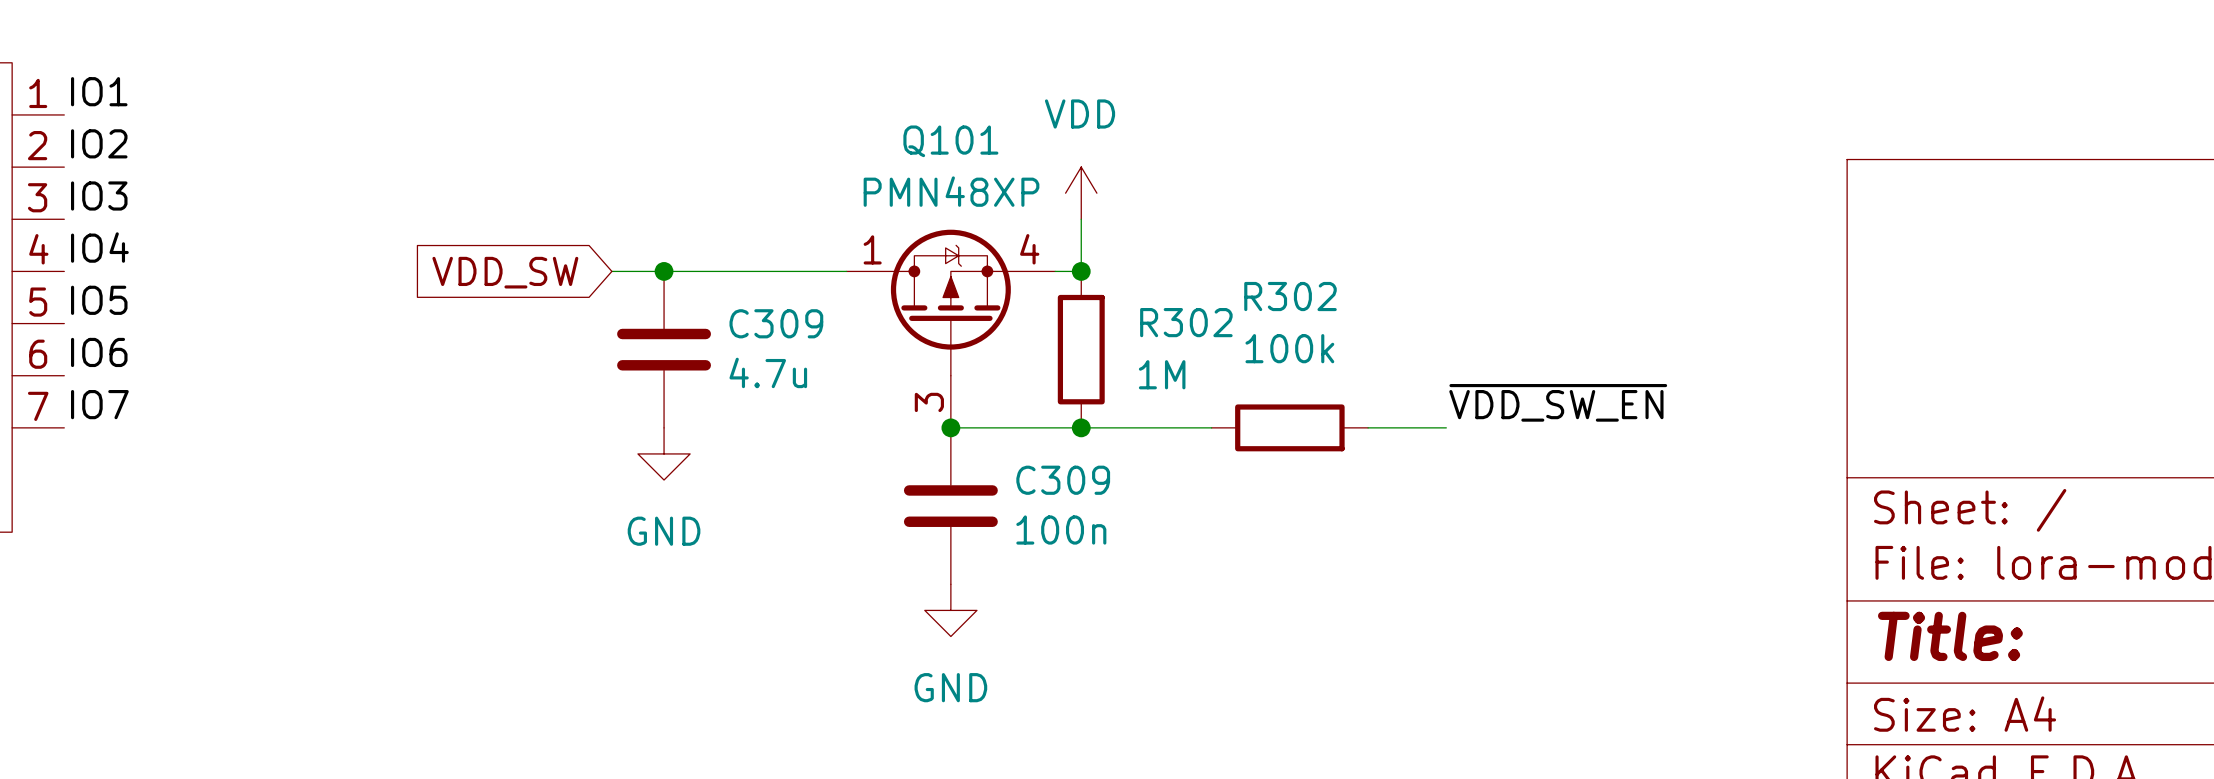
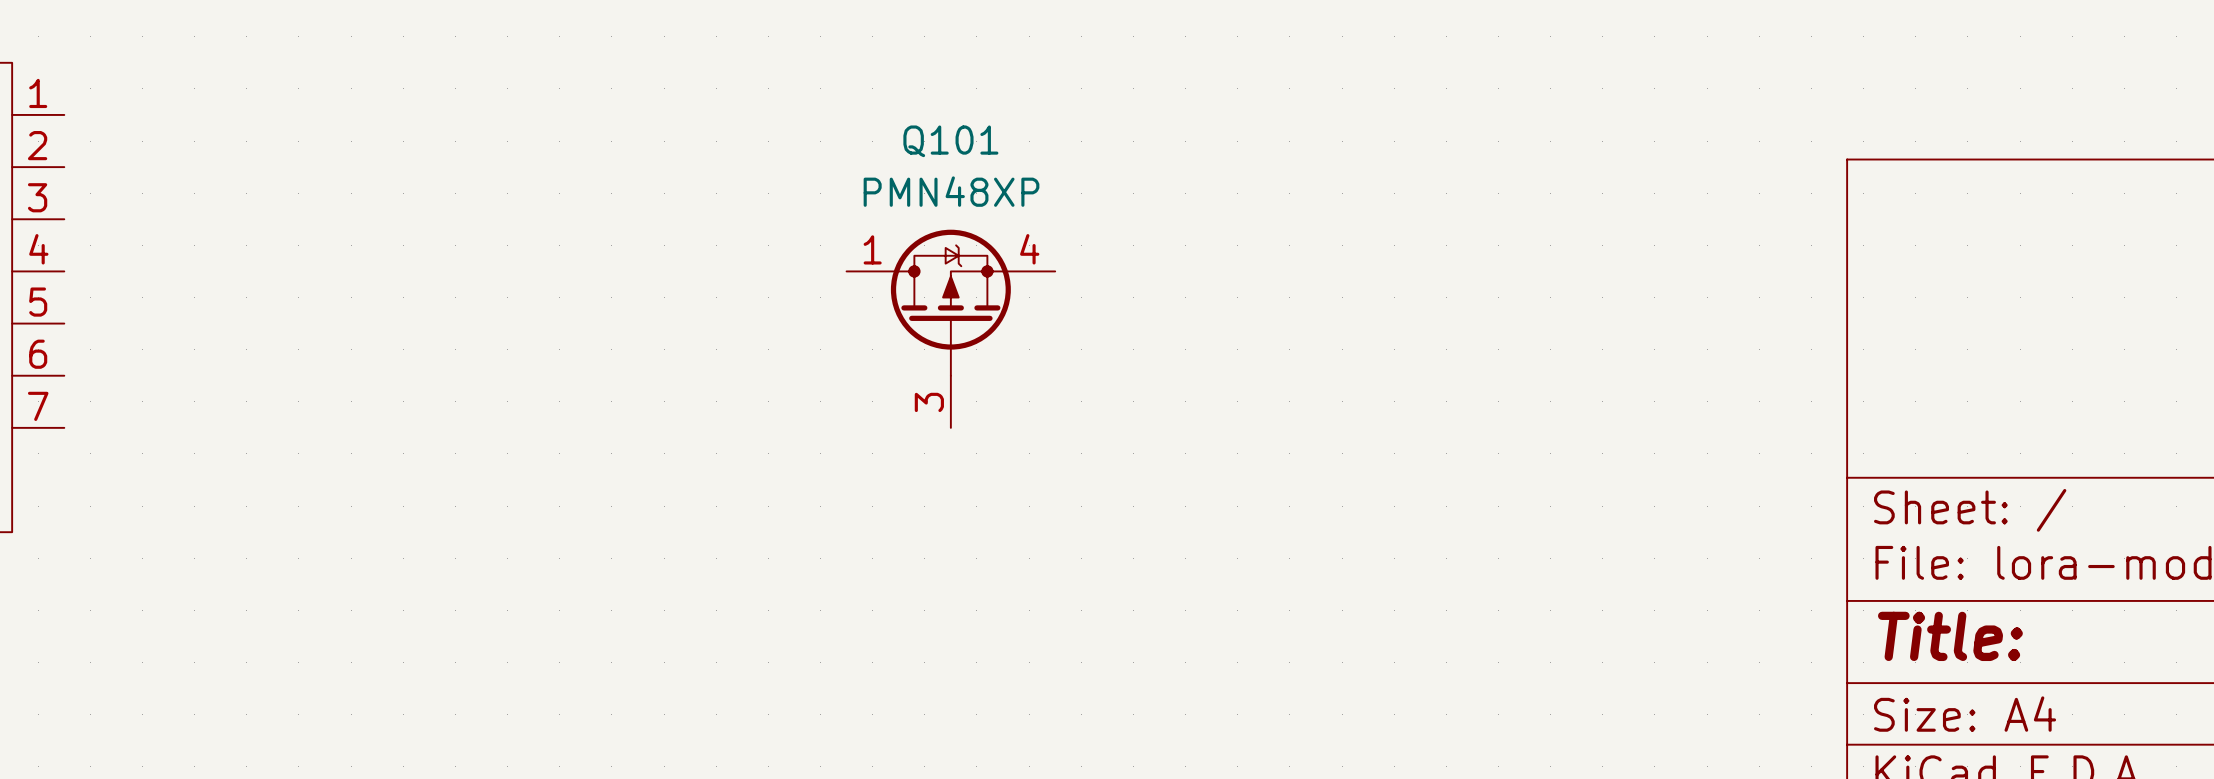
label: IO1 (99, 91) -> none
label: IO2 (99, 143) -> none
power symbol: VDD (1081, 193) -> none
label: IO3 (99, 196) -> none
wire: (1081, 219) (1081, 271) (1055, 271) -> none
label: IO4 (99, 247) -> none
wire: (611, 271) (846, 271) -> none
junction: (664, 271) -> none
junction: (1081, 271) -> none
global label: VDD_SW (505, 272) -> none
label: IO5 (99, 300) -> none
C309: 4.7u (664, 349) -> none
R302: 1M (1081, 349) -> none
label: IO6 (99, 352) -> none
label: ~{VDD_SW_EN} (1558, 402) -> none
label: IO7 (99, 404) -> none
wire: (950, 427) (1211, 427) -> none
junction: (950, 427) -> none
junction: (1081, 427) -> none
R302: 100k (1289, 427) -> none
wire: (1368, 427) (1446, 427) -> none
power symbol: GND (664, 453) -> none
C309: 100n (950, 506) -> none
power symbol: GND (950, 610) -> none

